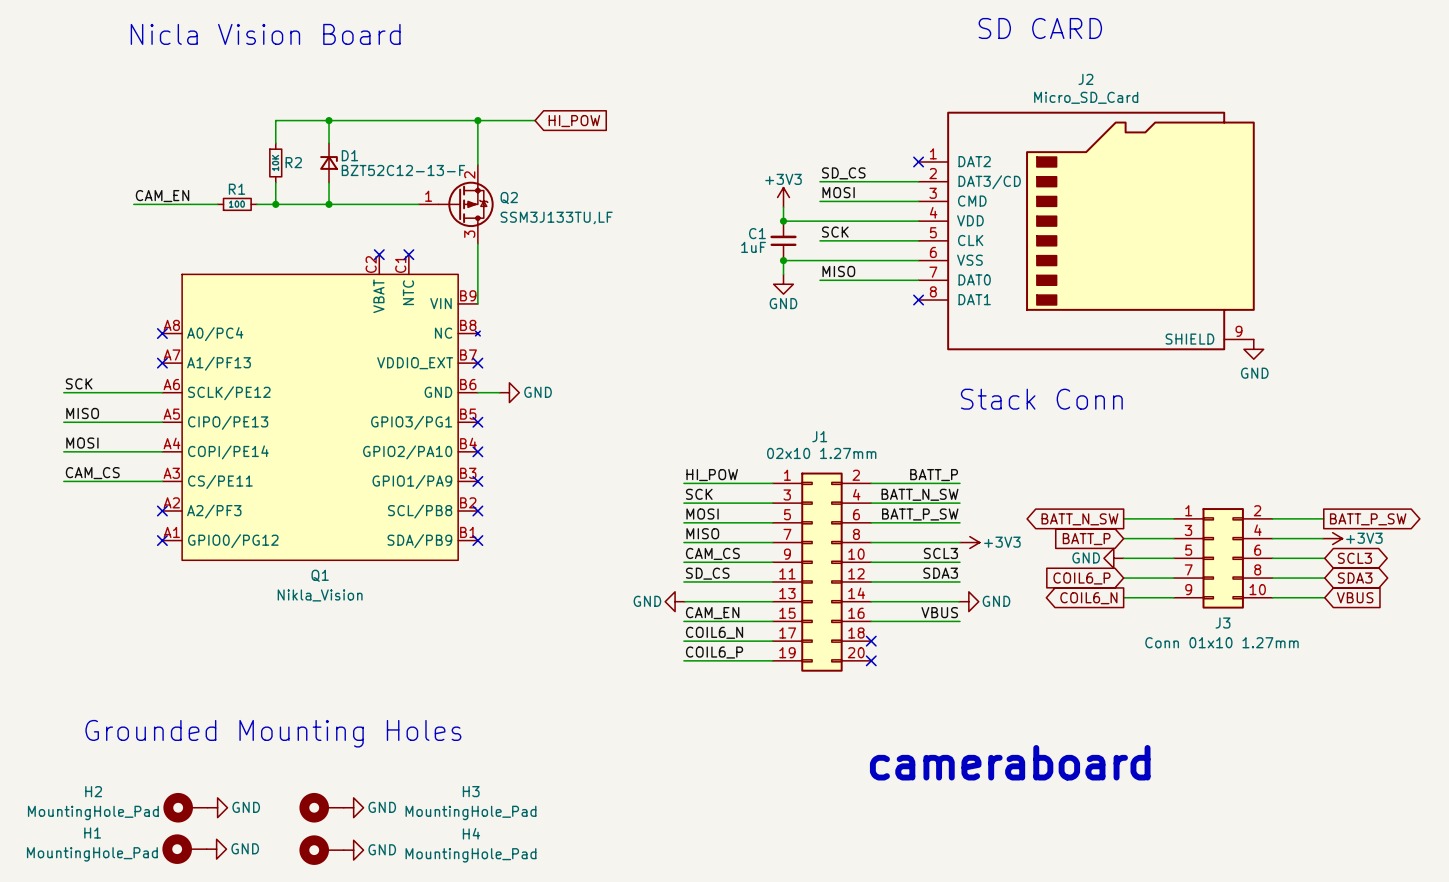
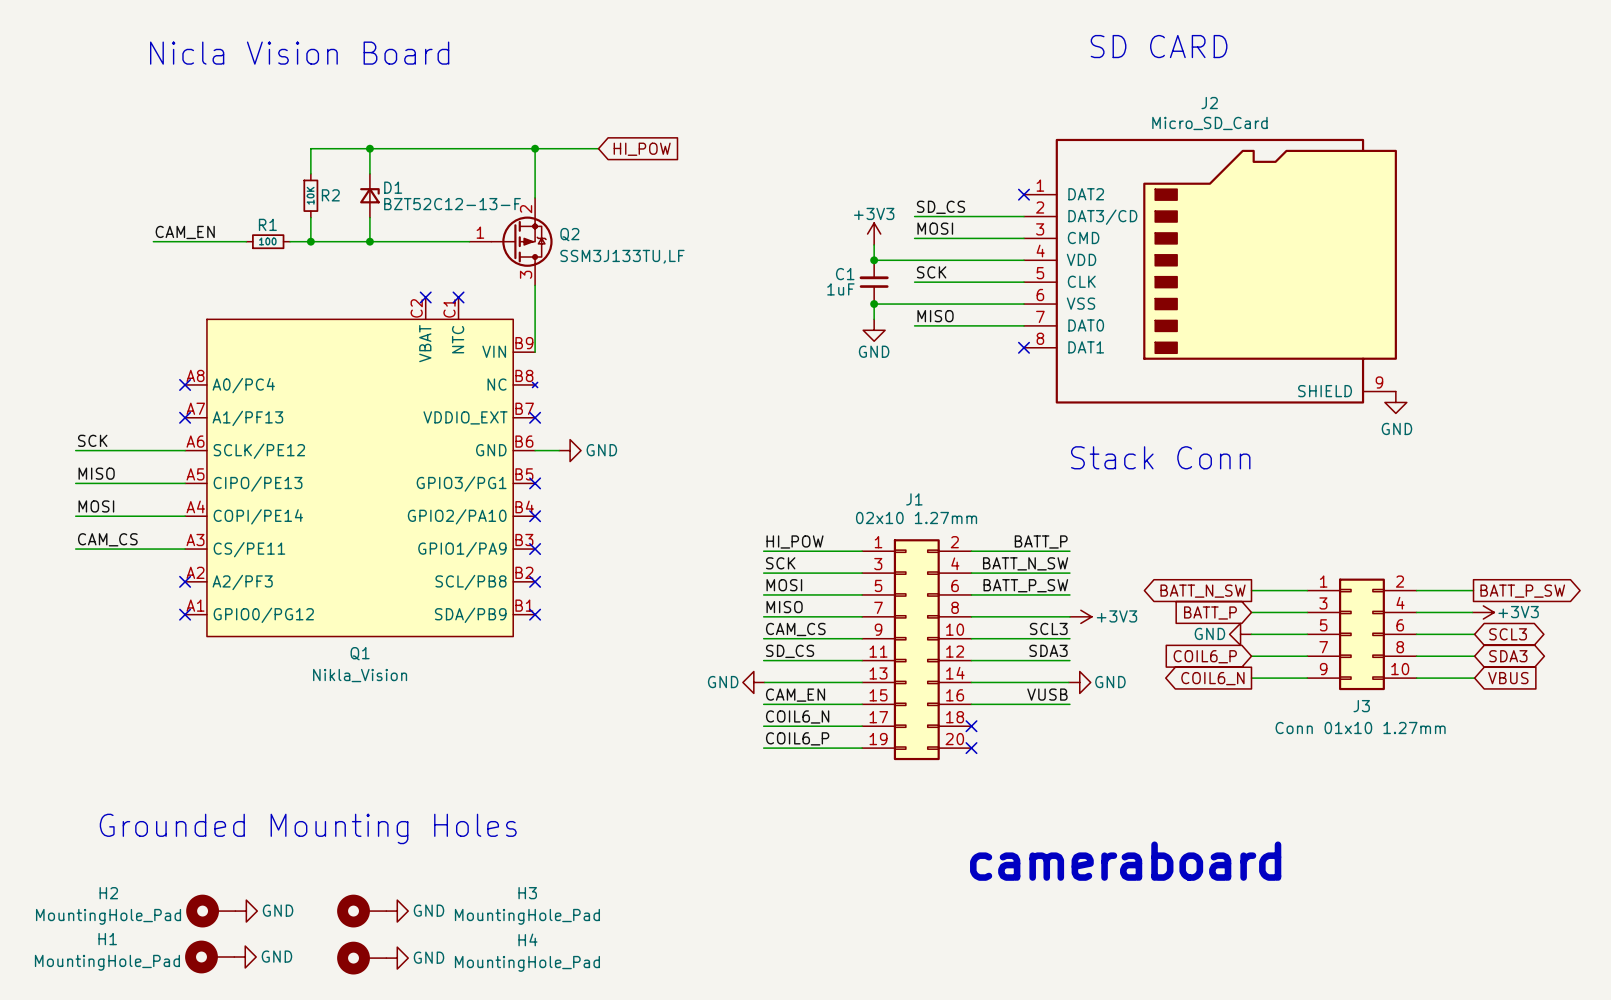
label: VBUS (939, 612) -> VUSB (1047, 694)

